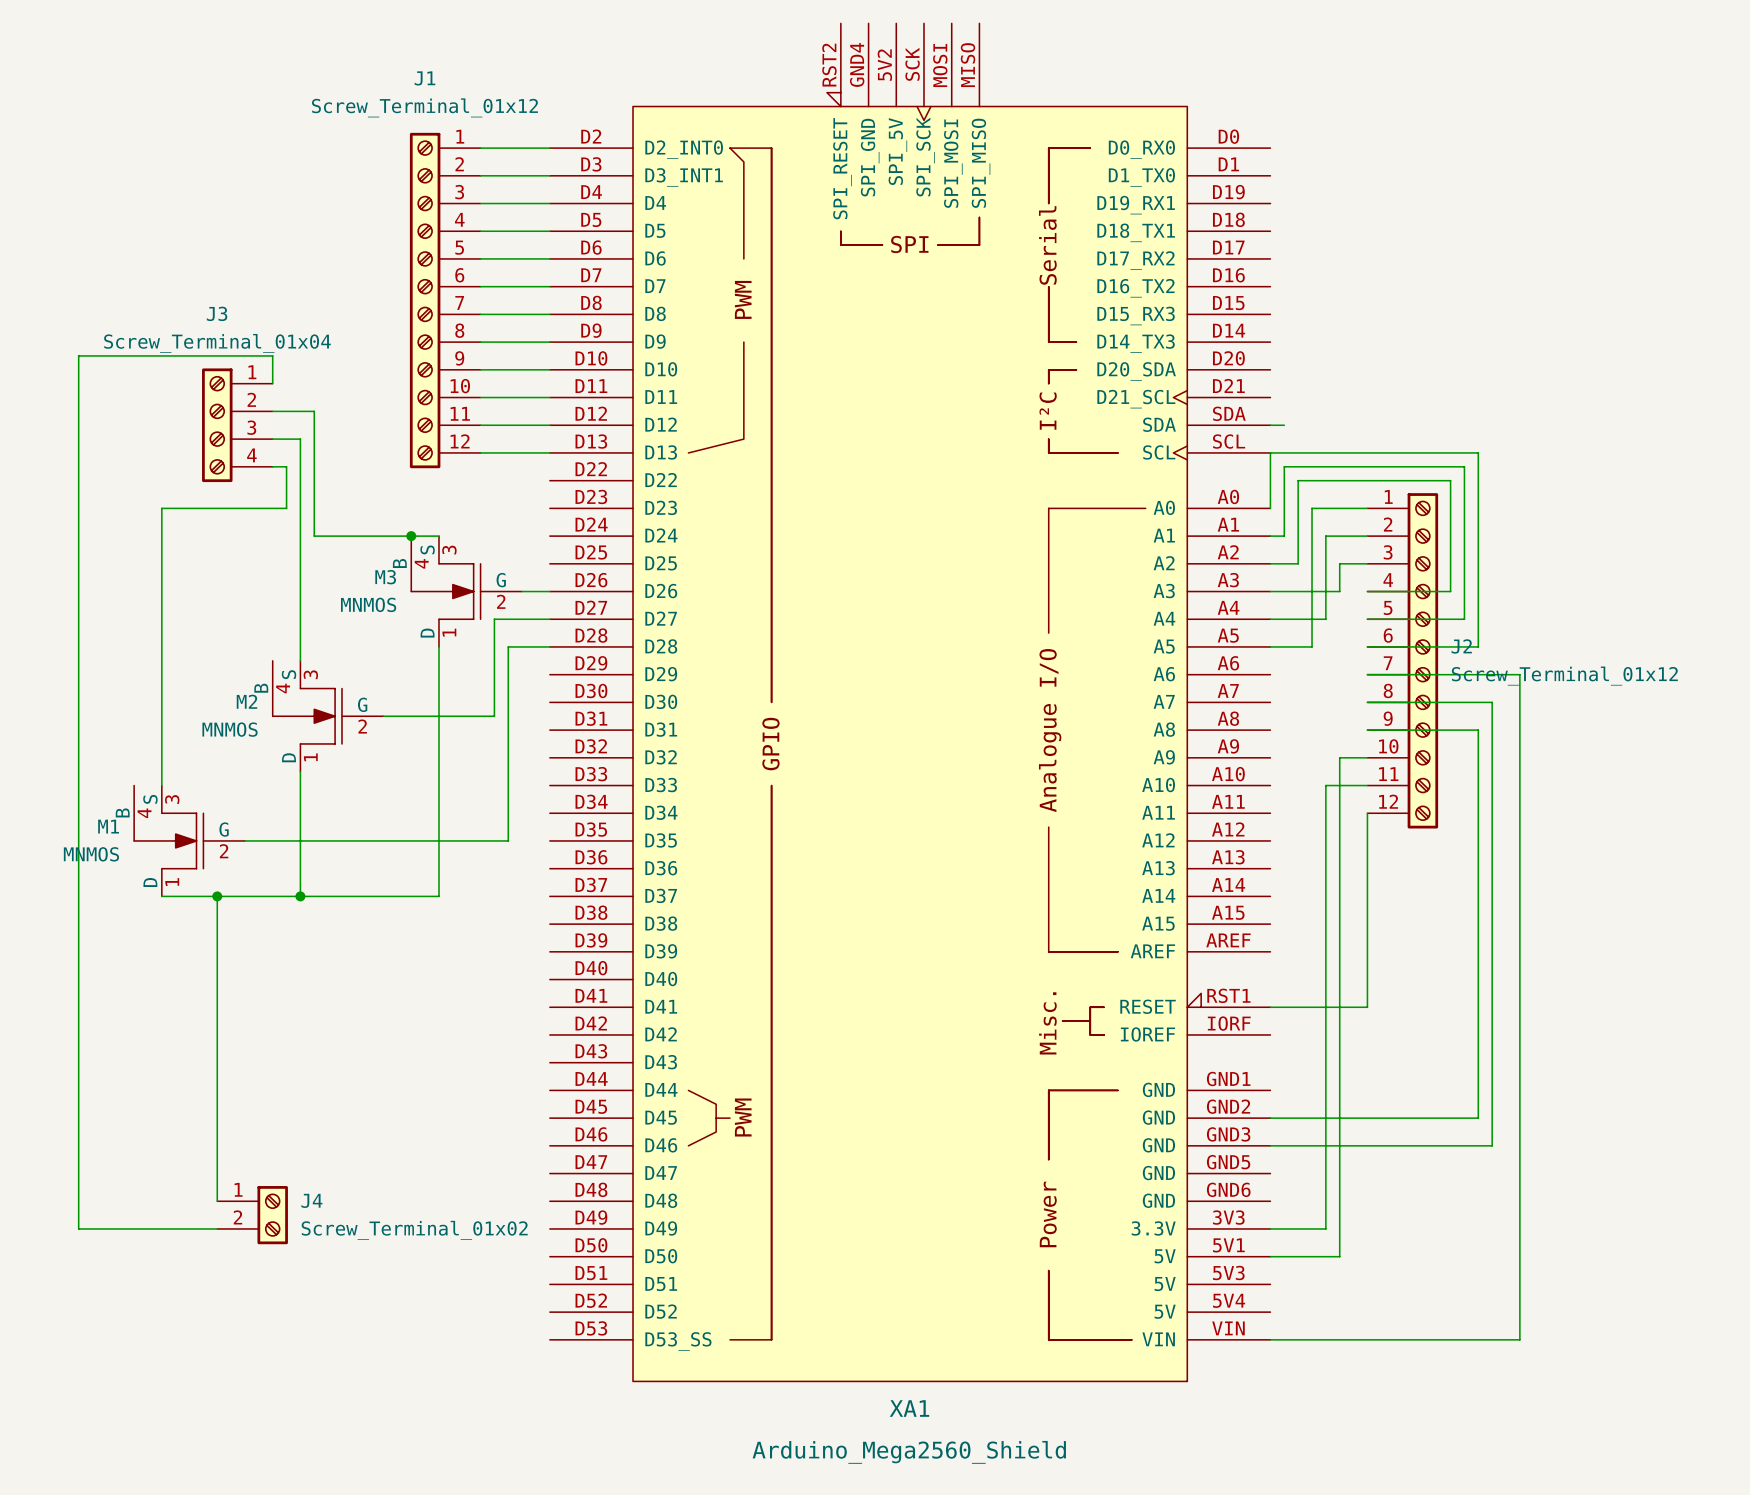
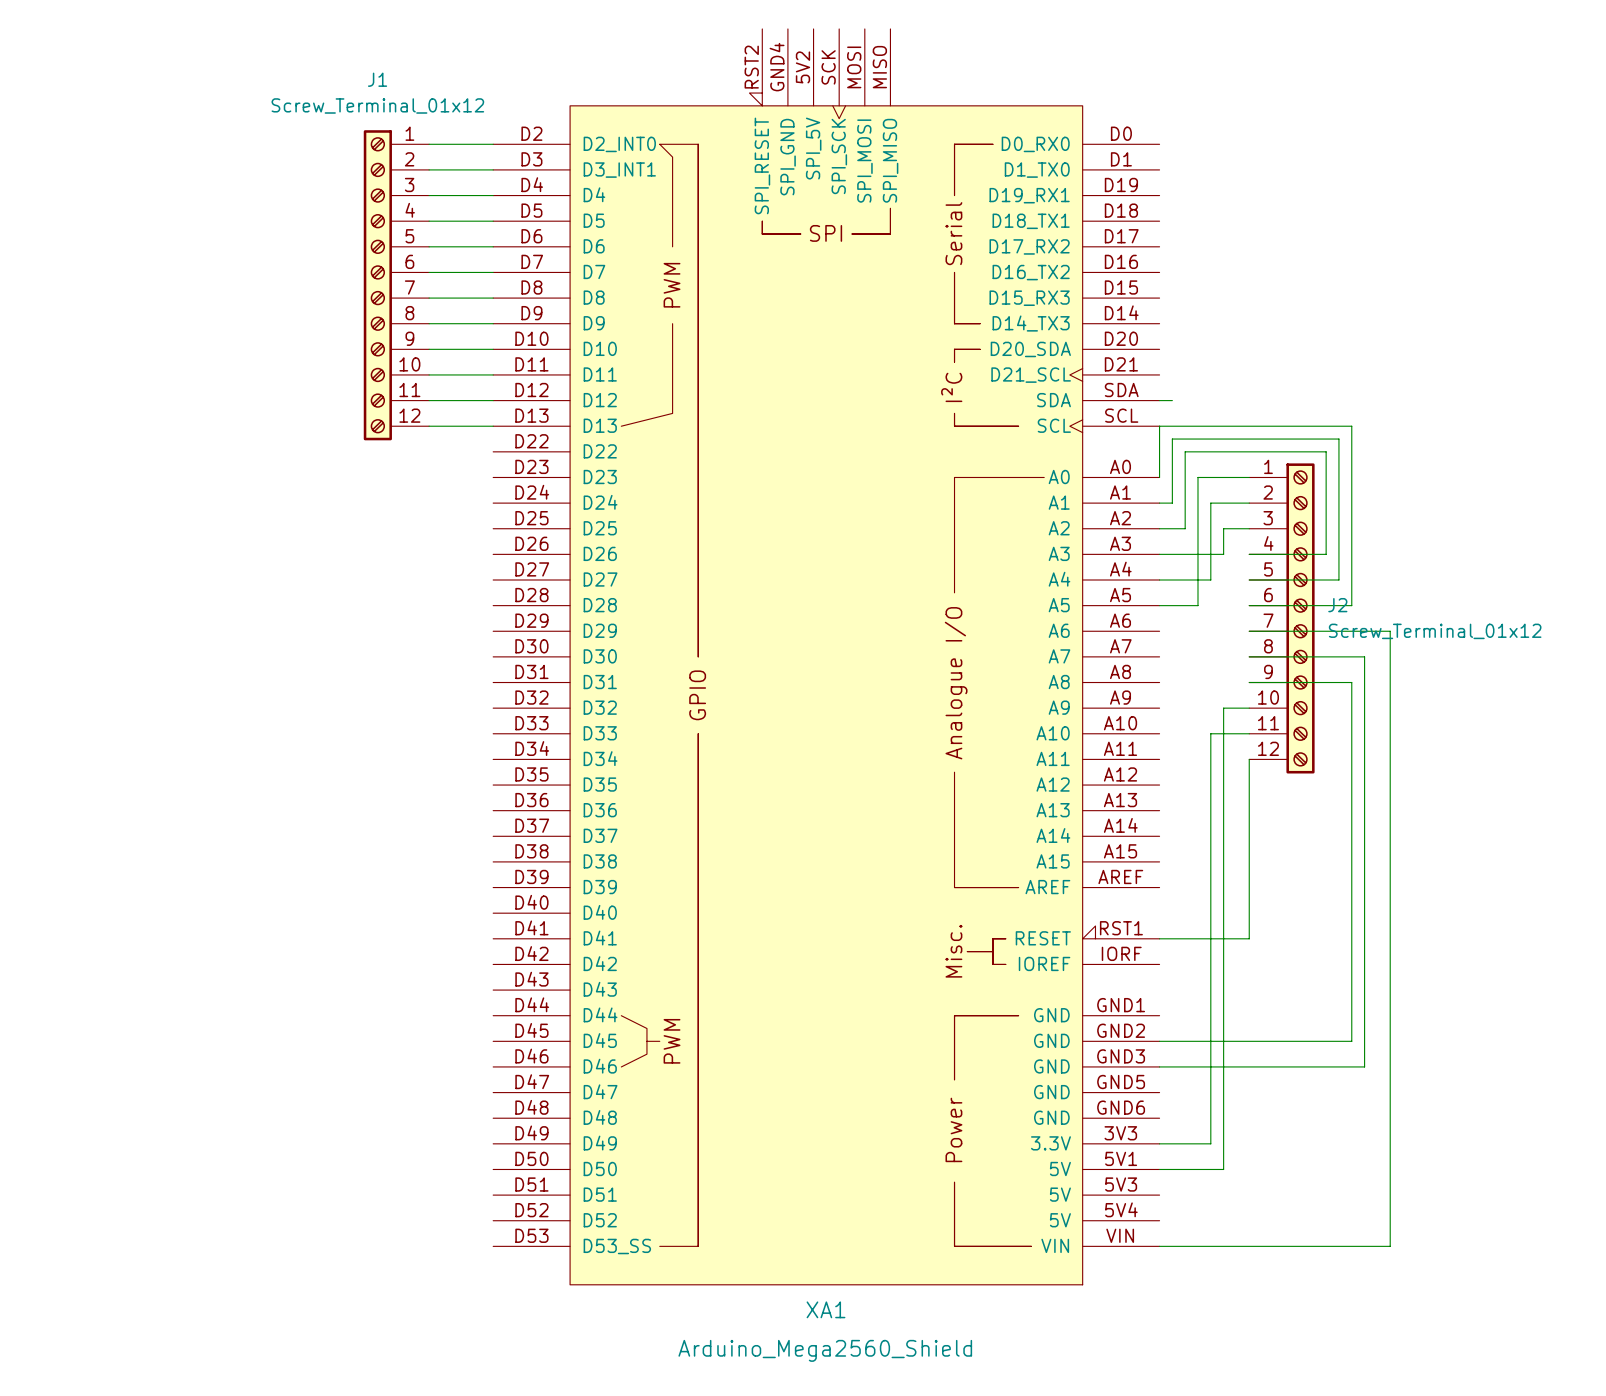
wire: (272, 383) (272, 355) (78, 355) (78, 1228) (217, 1228) -> none
wire: (272, 411) (314, 411) (314, 536) (438, 536) -> none
J3: Screw_Terminal_01x04 (237, 425) -> none
wire: (272, 439) (300, 439) (300, 660) -> none
wire: (272, 466) (286, 466) (286, 508) (161, 508) (161, 785) -> none
junction: (411, 536) -> none
M3: MNMOS (466, 591) -> none
wire: (522, 591) (549, 591) -> none
wire: (549, 619) (494, 619) (494, 716) (383, 716) -> none
wire: (438, 646) (438, 896) (161, 896) -> none
wire: (549, 646) (508, 646) (508, 840) (244, 840) -> none
M2: MNMOS (328, 716) -> none
wire: (300, 771) (300, 896) -> none
M1: MNMOS (189, 840) -> none
wire: (217, 896) (217, 1201) -> none
junction: (217, 896) -> none
junction: (300, 896) -> none
J4: Screw_Terminal_01x02 (252, 1215) -> none

